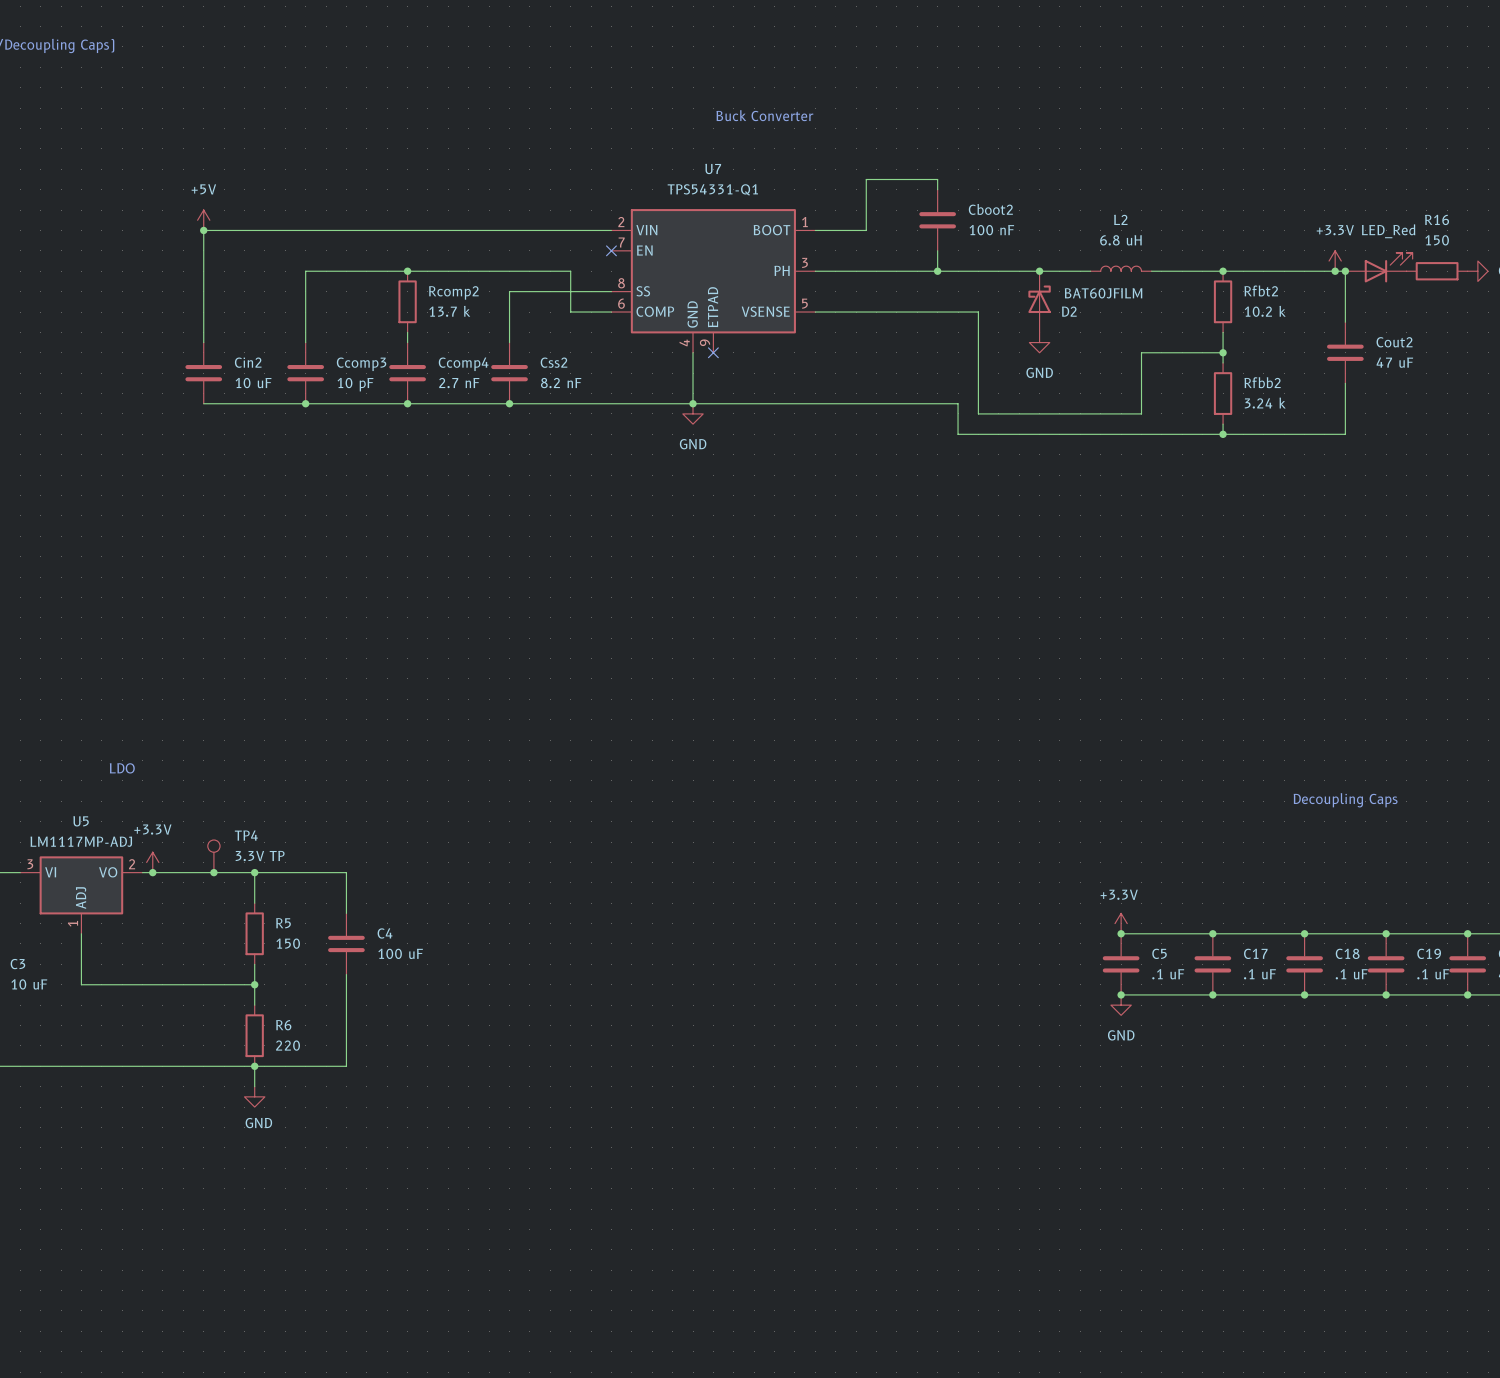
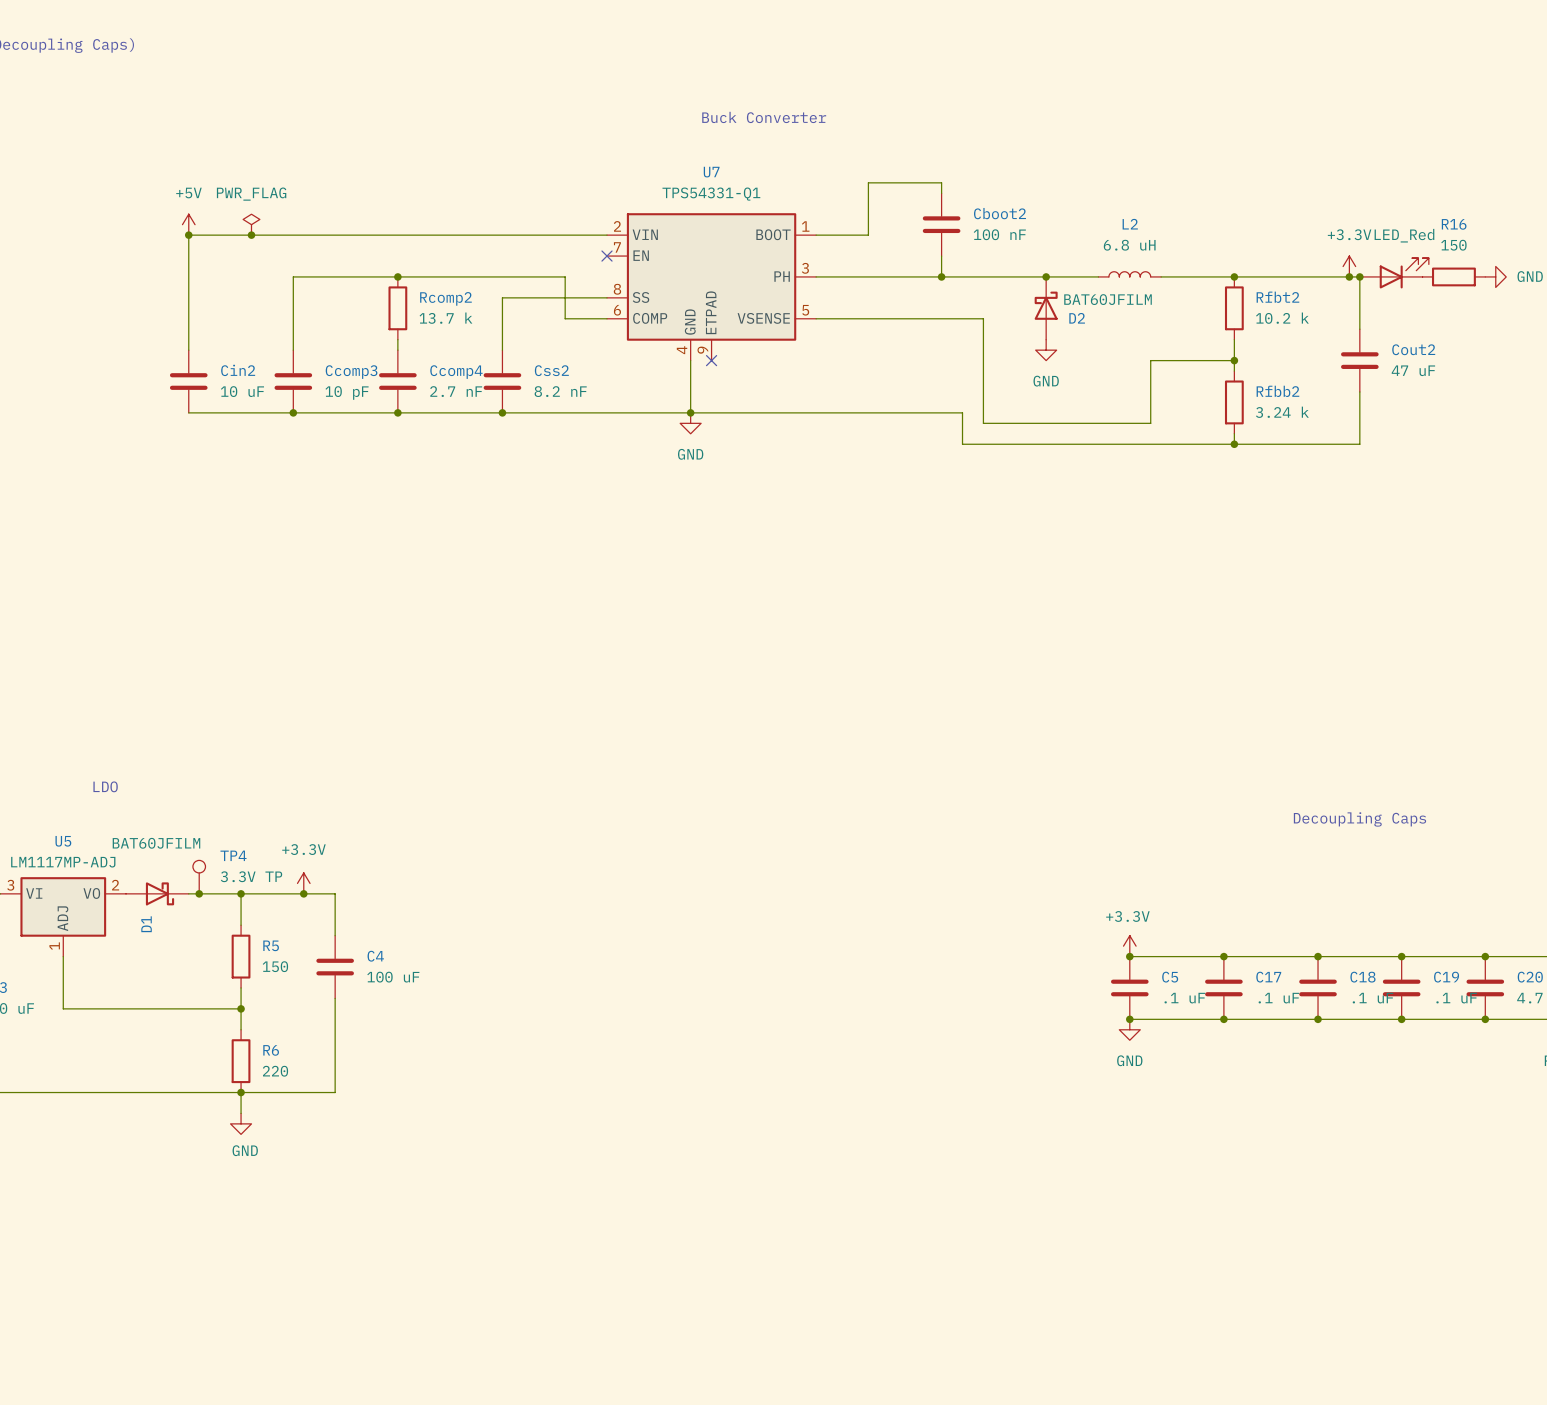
power symbol: none -> PWR_FLAG (251, 224)
junction: none -> (251, 235)
power symbol position: +3.3V (152, 862) -> +3.3V (303, 883)
junction: (152, 872) -> none
D1: none -> BAT60JFILM (157, 893)
junction: none -> (303, 893)

